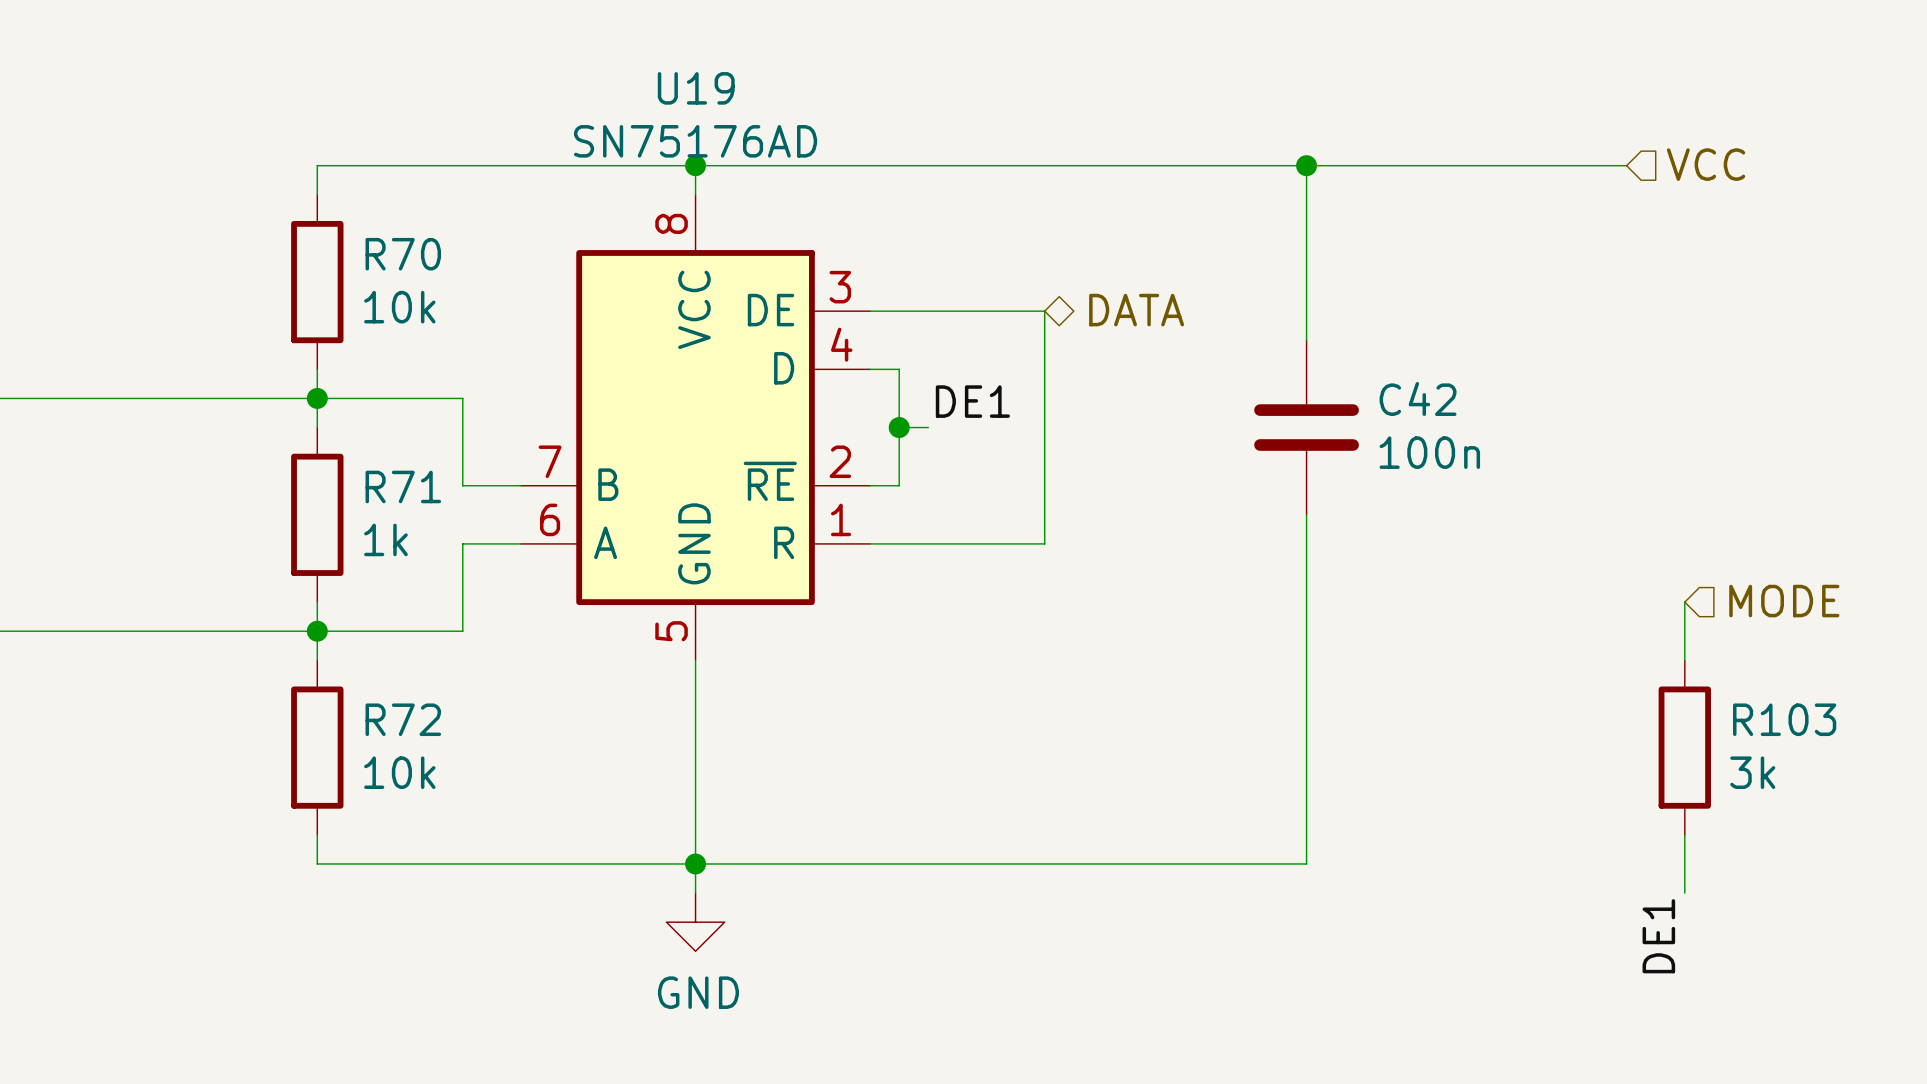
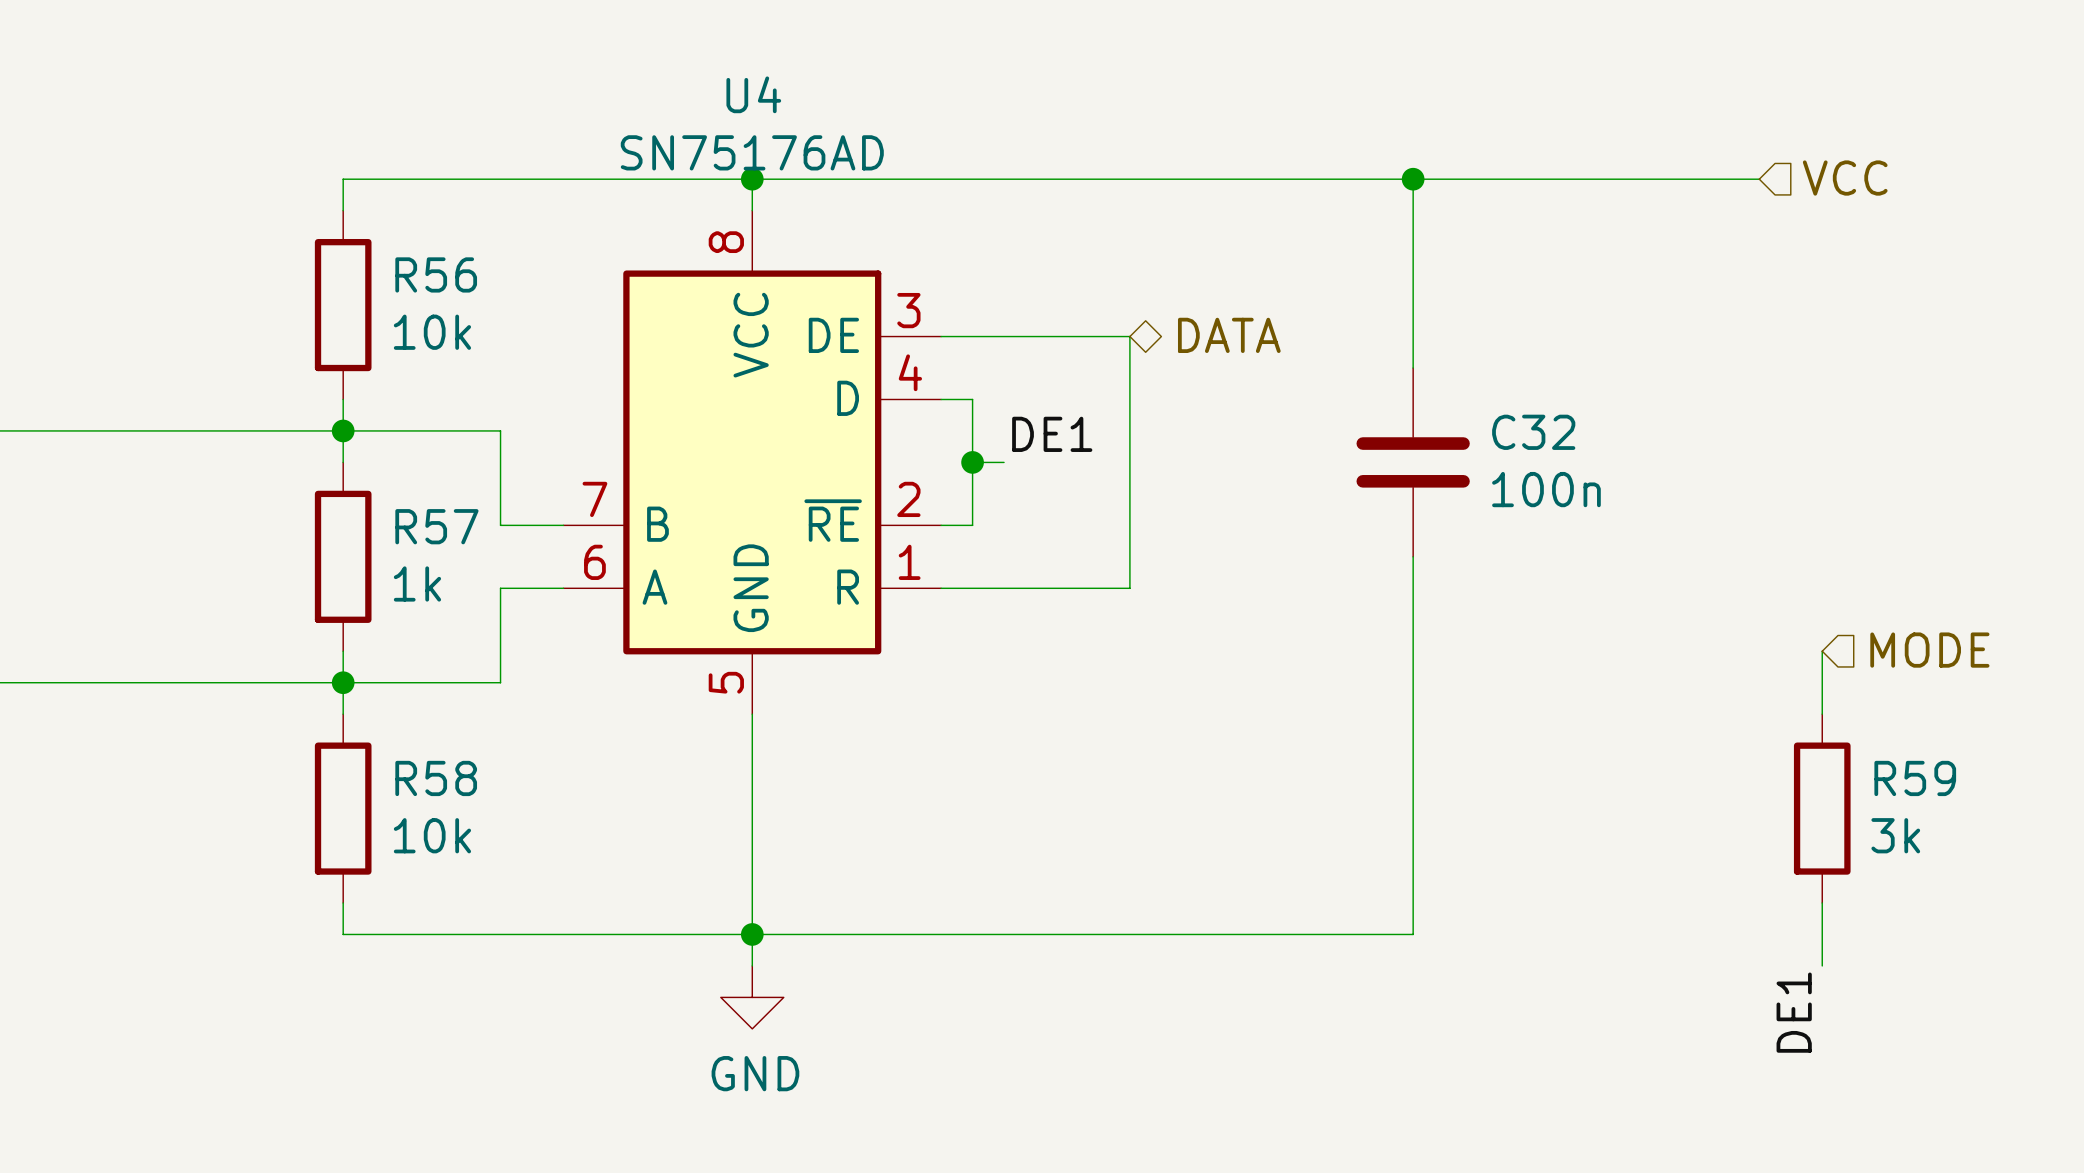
U19 name: U19 (696, 88) -> U4 (753, 94)
R70 name: R70 (403, 254) -> R56 (436, 274)
C42 name: C42 (1418, 399) -> C32 (1533, 432)
R71 name: R71 (403, 486) -> R57 (436, 526)
R72 name: R72 (403, 719) -> R58 (436, 778)
R103 name: R103 (1784, 719) -> R59 (1915, 778)

